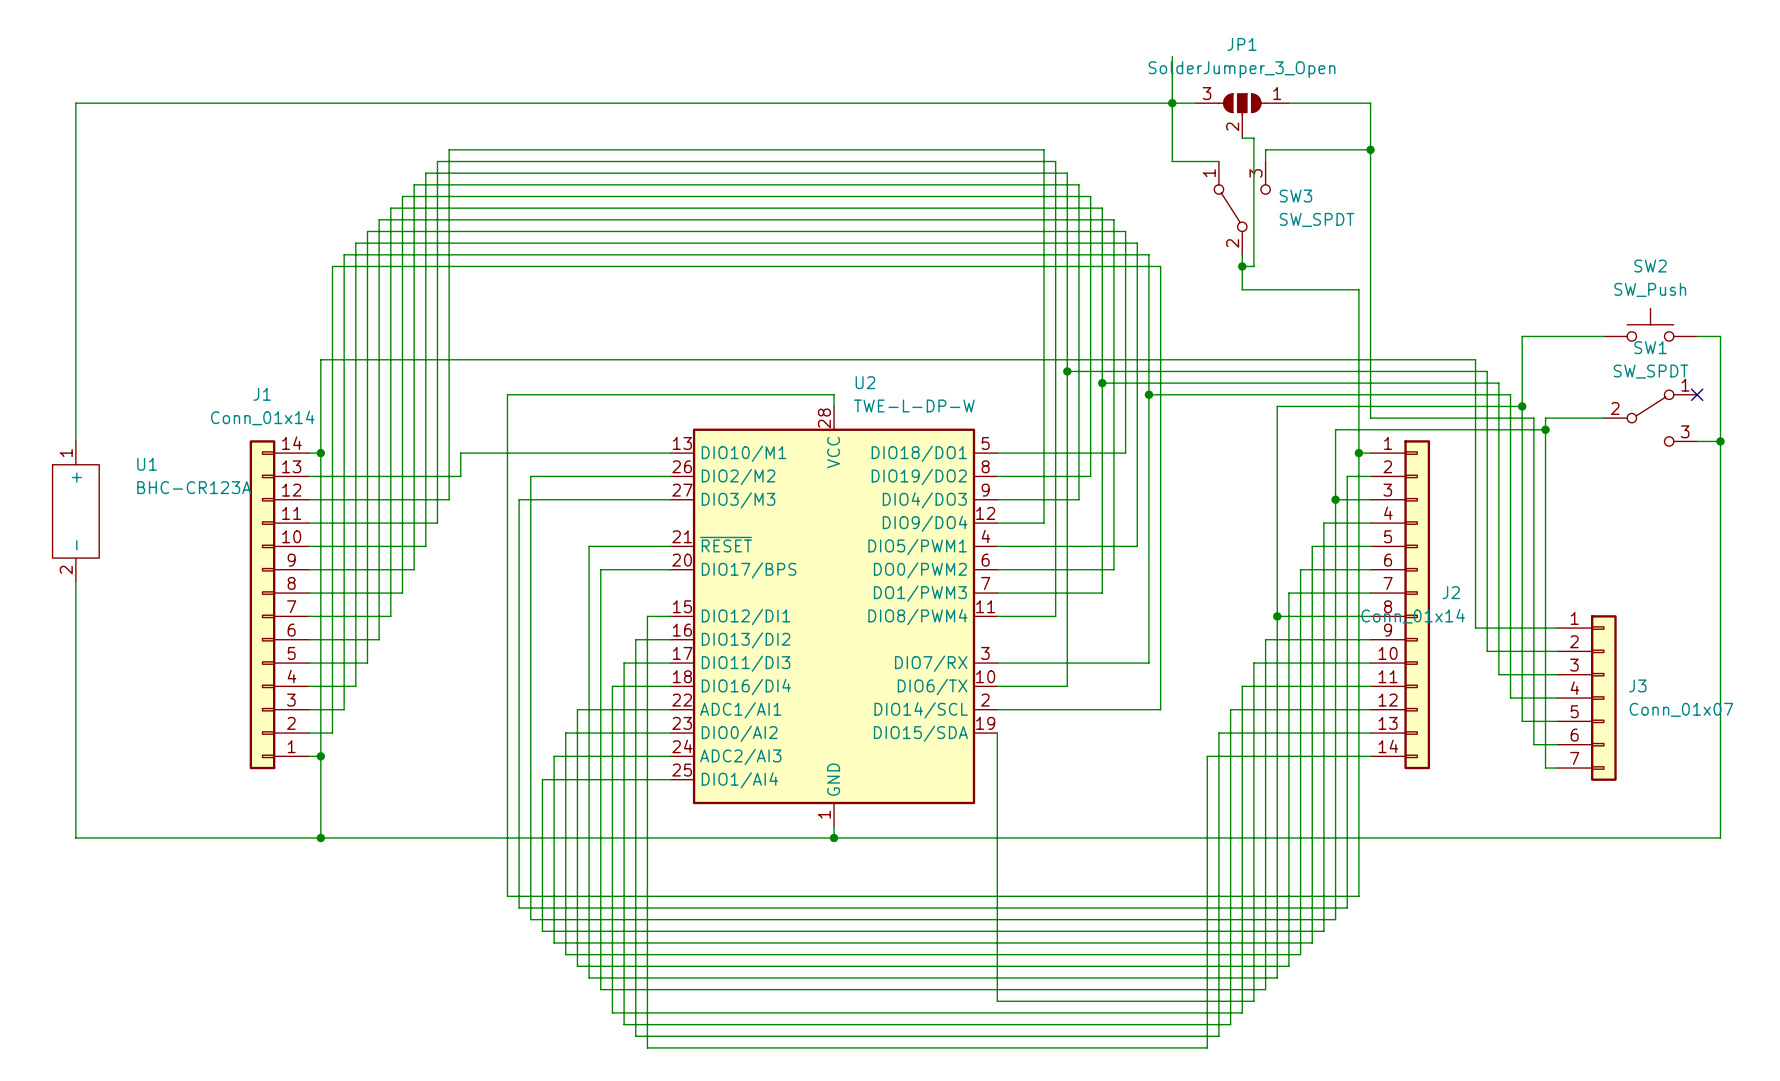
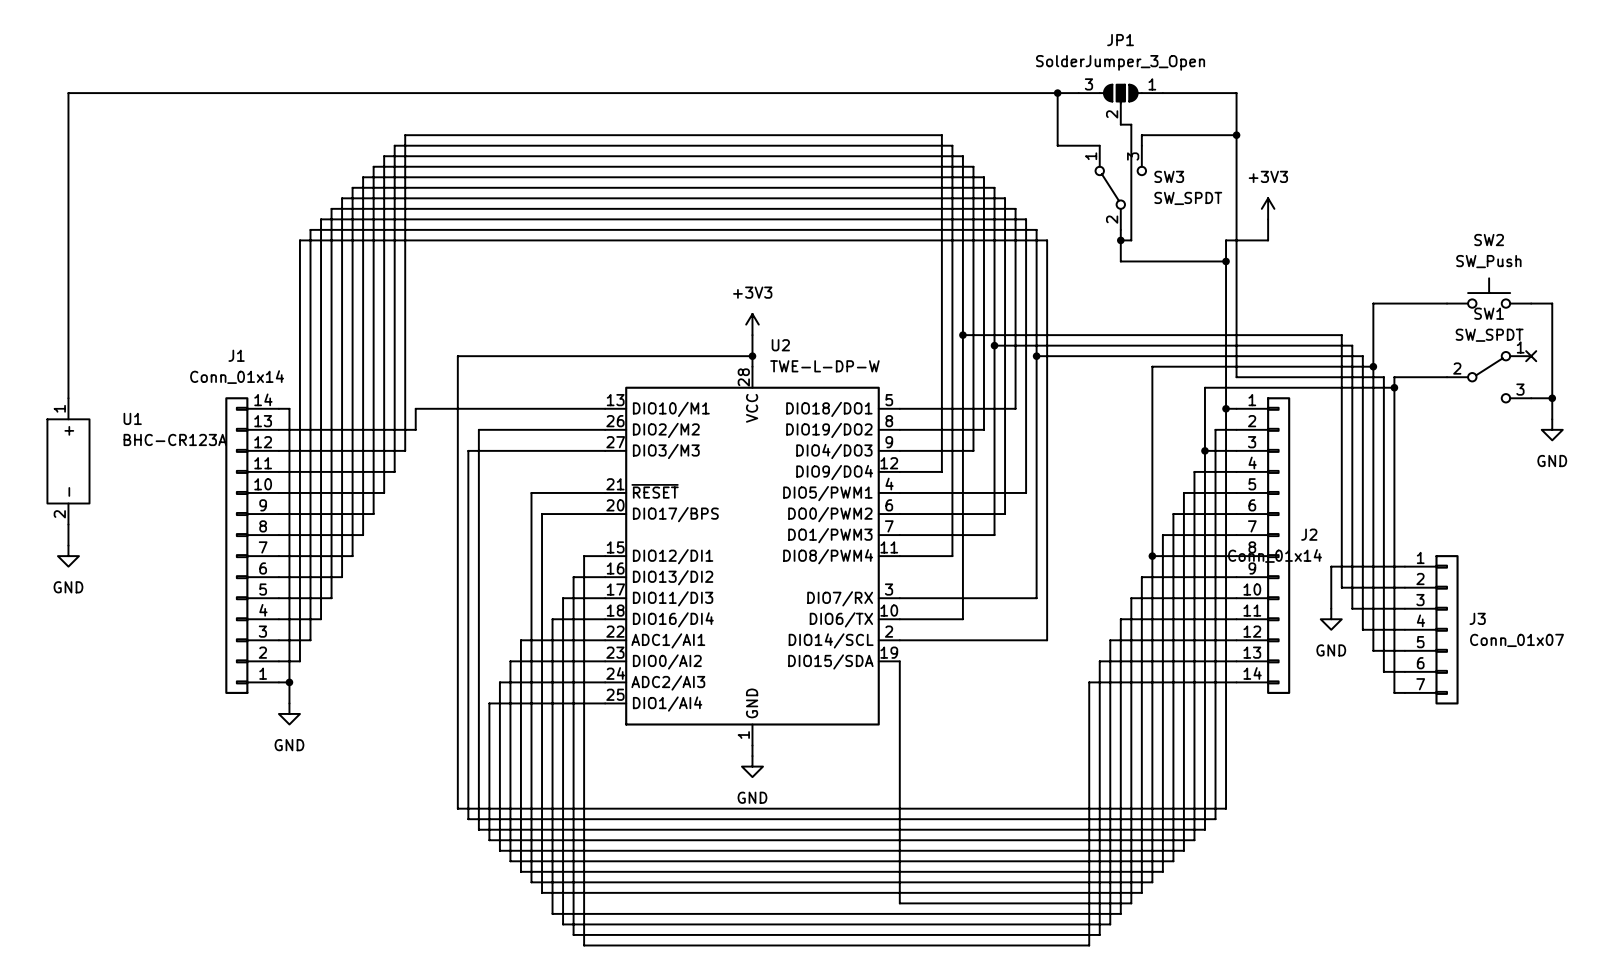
wire: (1172, 56) (1172, 103) -> none
power symbol: none -> +3V3 (1268, 208)
wire: none -> (1268, 219) (1268, 240) (1226, 240) (1226, 261)
junction: none -> (1226, 261)
power symbol: none -> +3V3 (752, 324)
wire: none -> (752, 335) (752, 356)
junction: none -> (752, 356)
wire: (320, 453) (320, 359) (1475, 359) (1475, 628) -> (1331, 608) (1331, 566)
junction: (320, 453) -> none
wire: (1720, 464) (1720, 838) (75, 838) (75, 604) -> none
power symbol: none -> GND (1552, 429)
power symbol: none -> GND (68, 556)
power symbol: none -> GND (1331, 619)
wire: (320, 779) (320, 838) -> none
power symbol: none -> GND (289, 713)
junction: (320, 838) -> none
junction: (834, 838) -> none
power symbol: none -> GND (752, 766)

